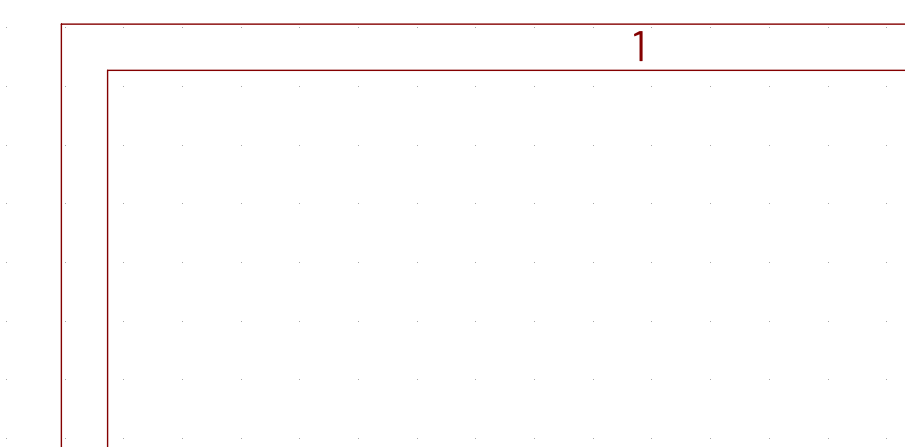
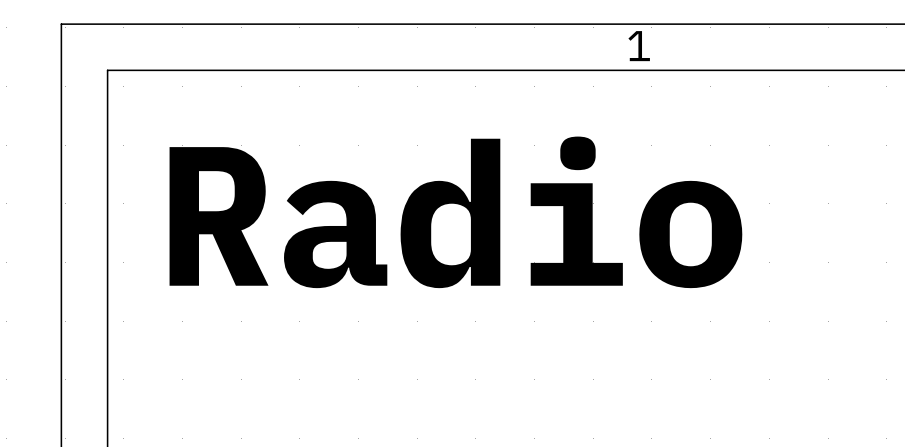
text: none -> Radio (455, 212)

